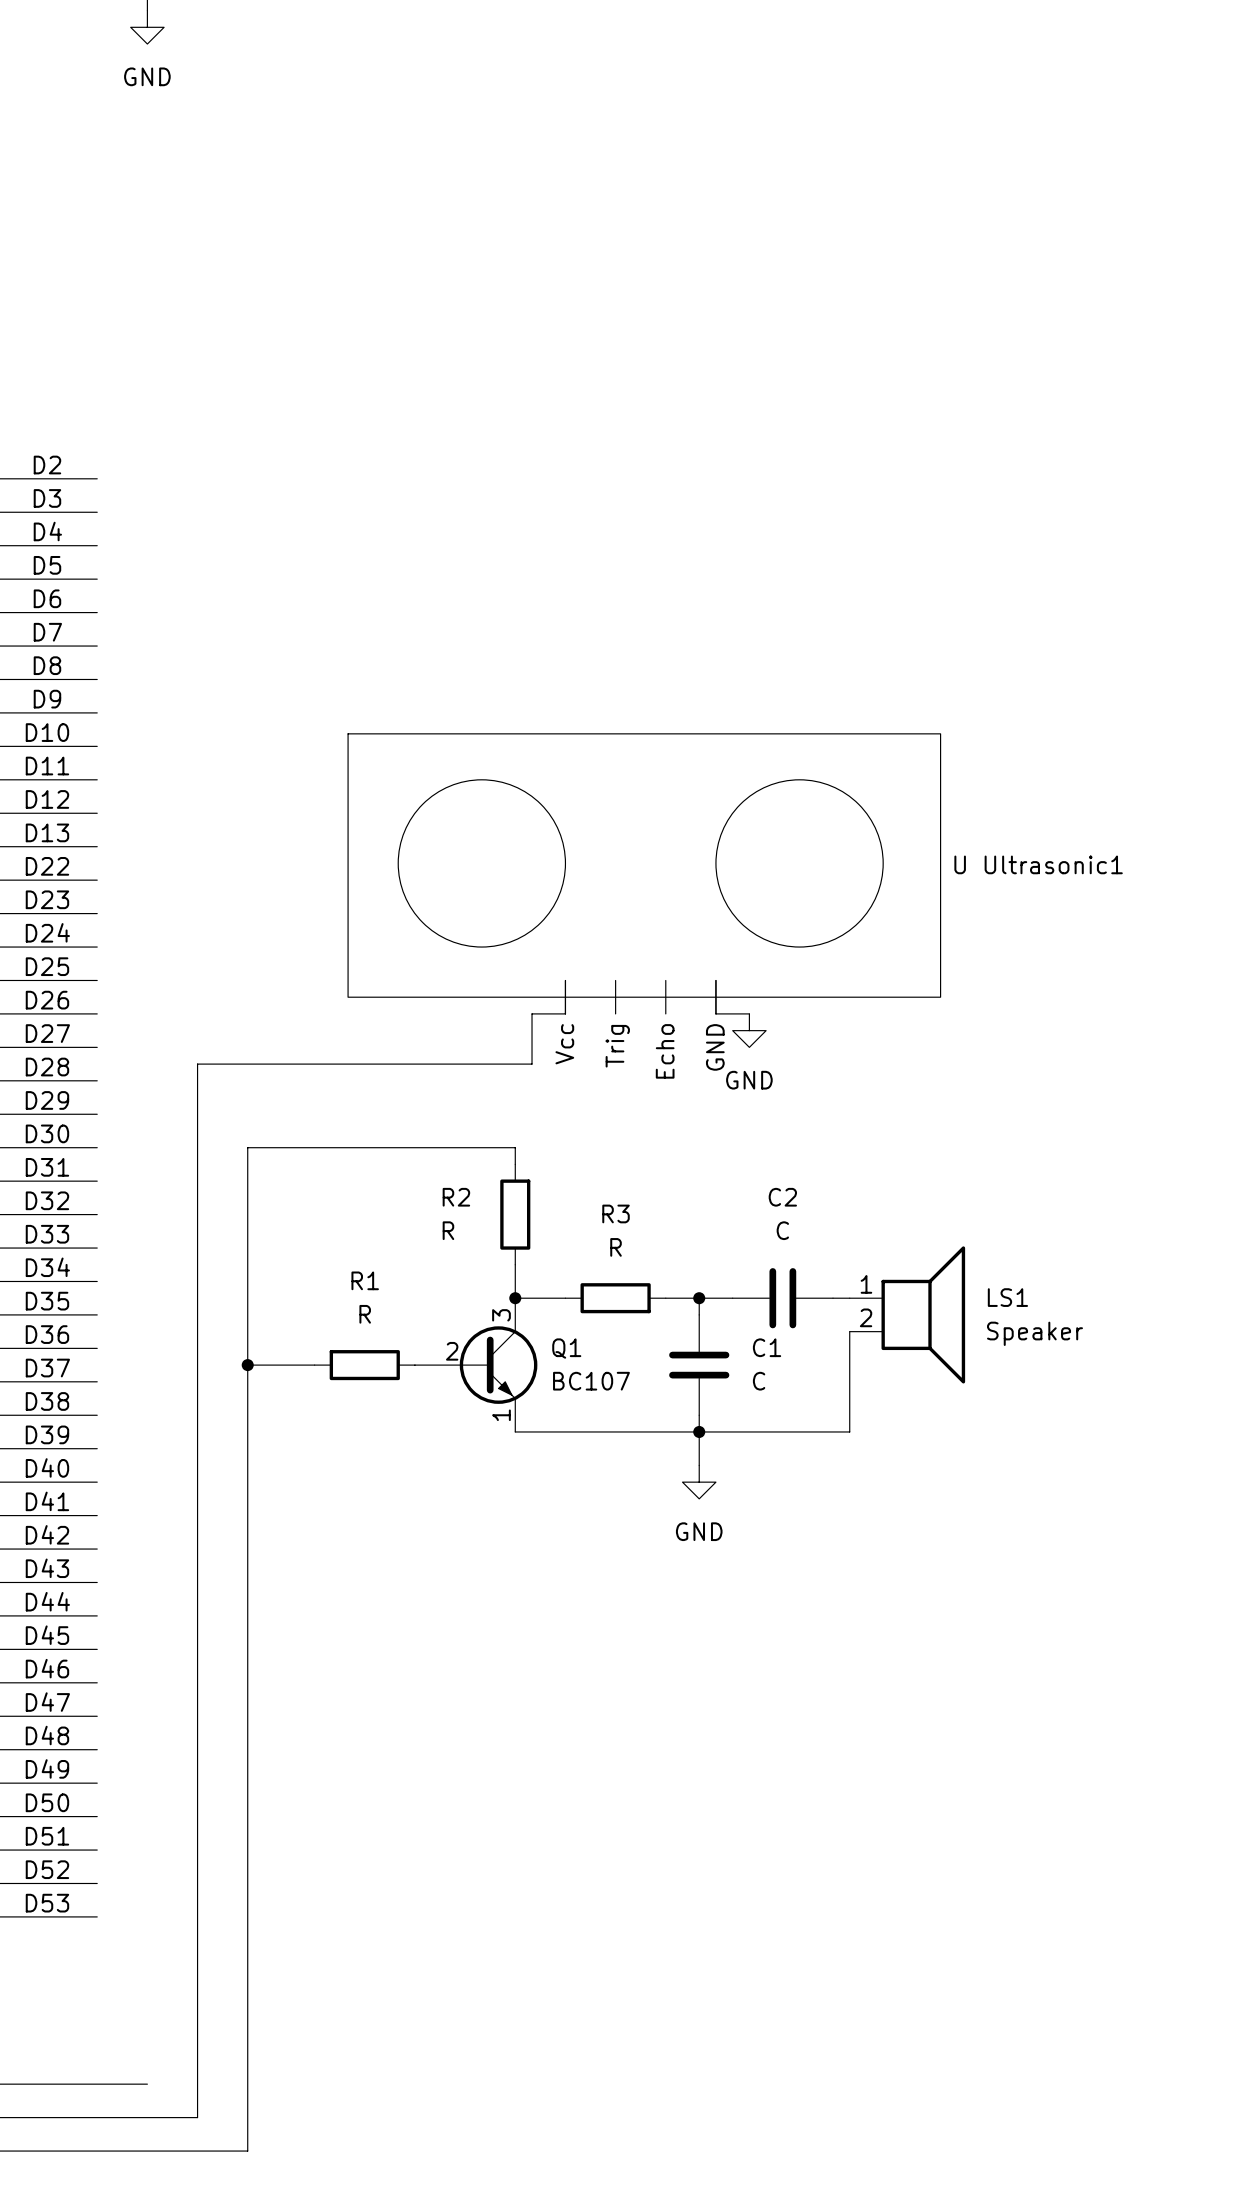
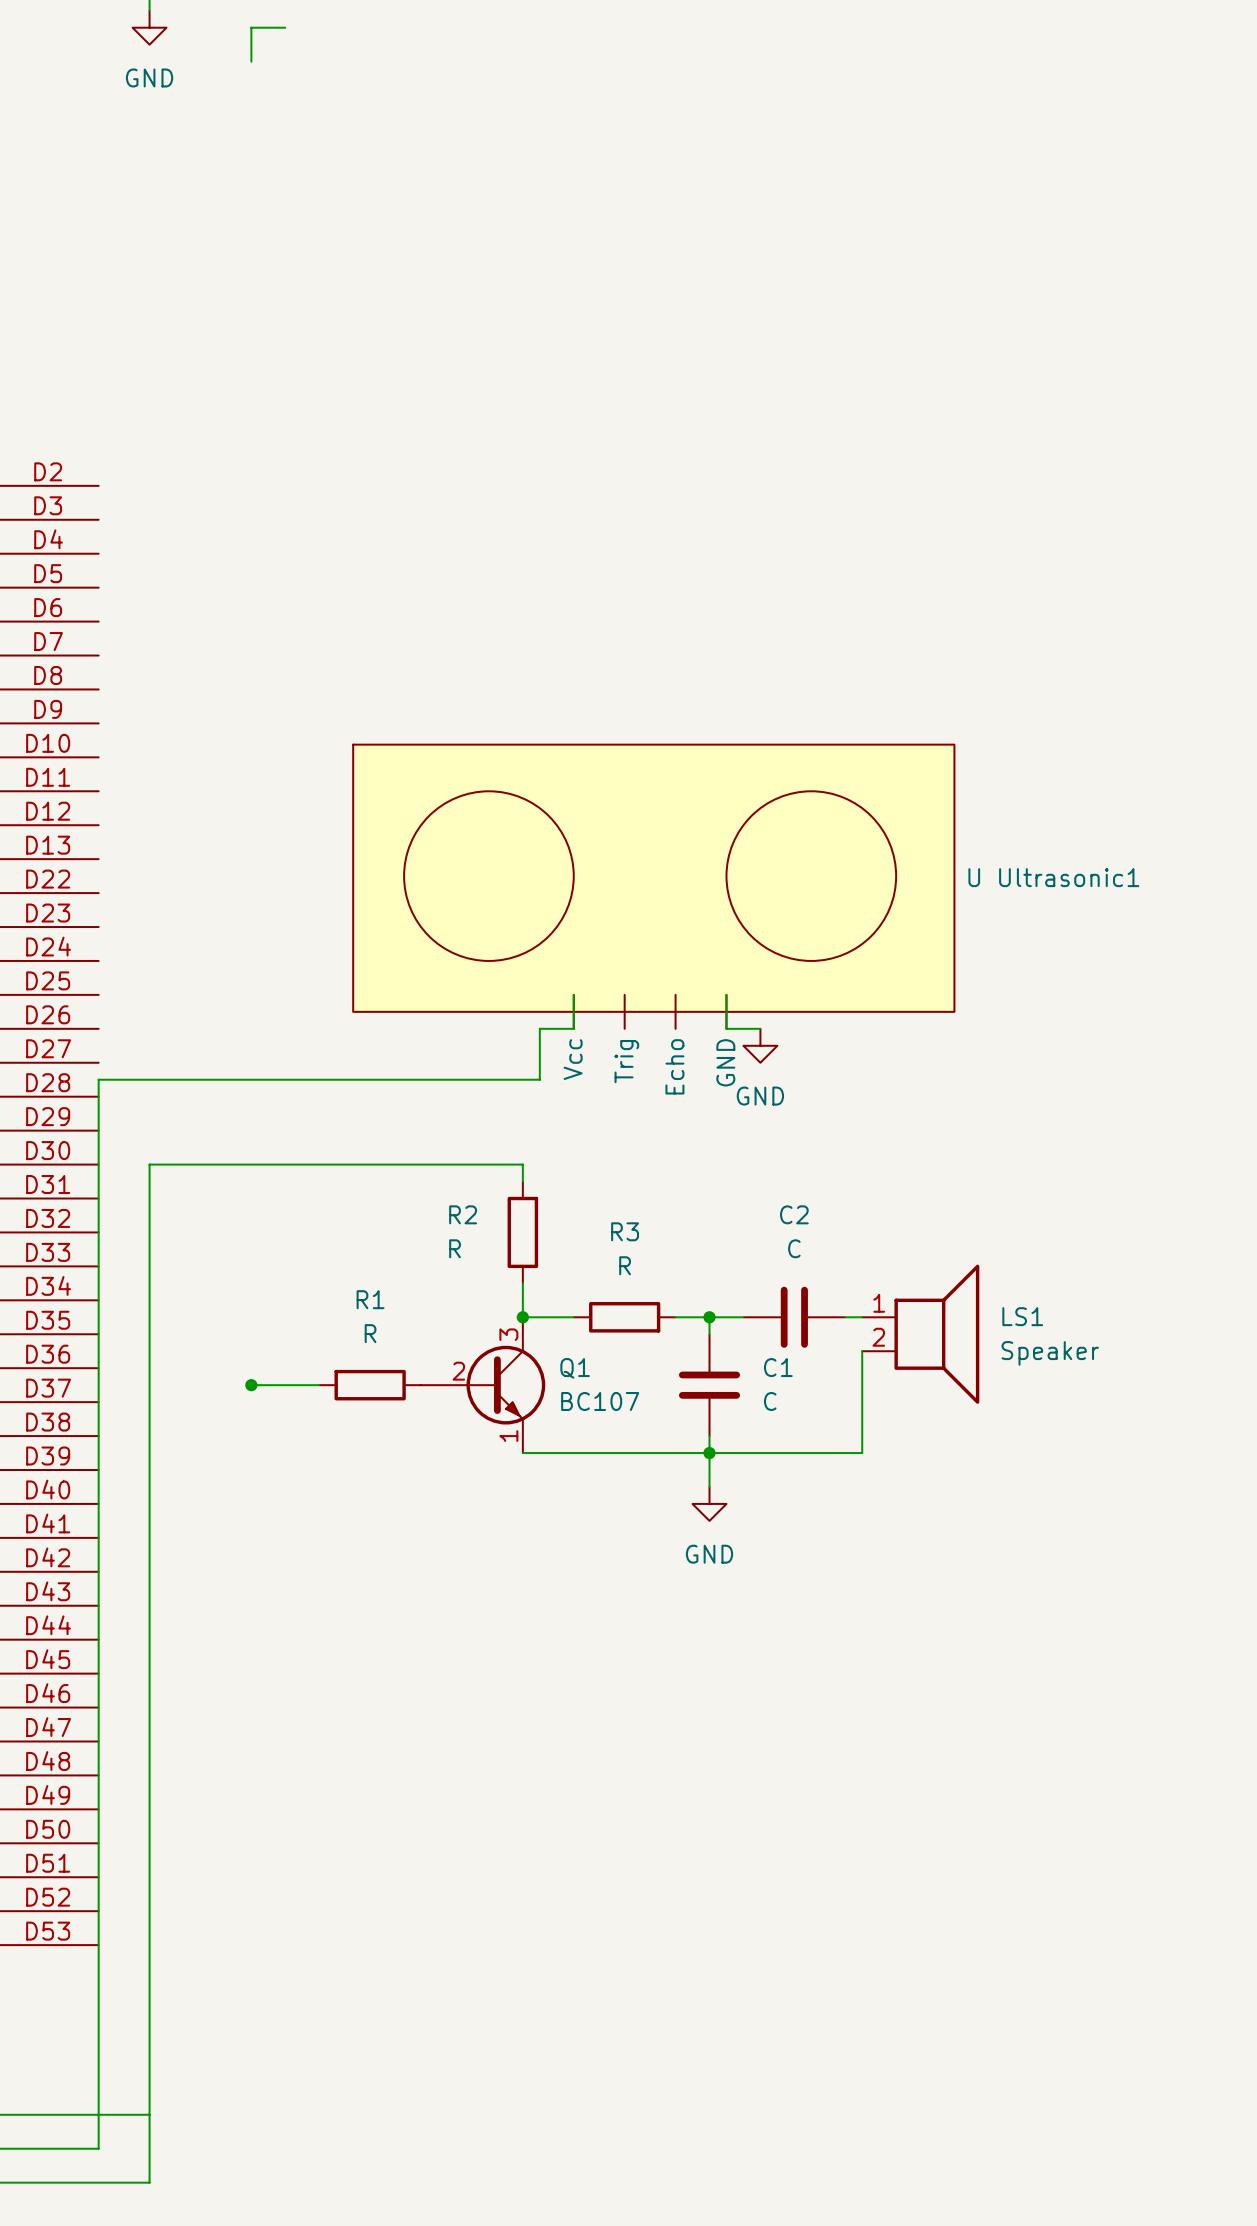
wire: none -> (285, 27) (251, 27) (251, 61)
wire: (197, 1064) (197, 2117) (97, 2117) -> (200, 1079) (98, 1079) (98, 2148)
wire: (247, 1147) (247, 2151) (147, 2151) -> (251, 1164) (149, 1164) (149, 2182)

